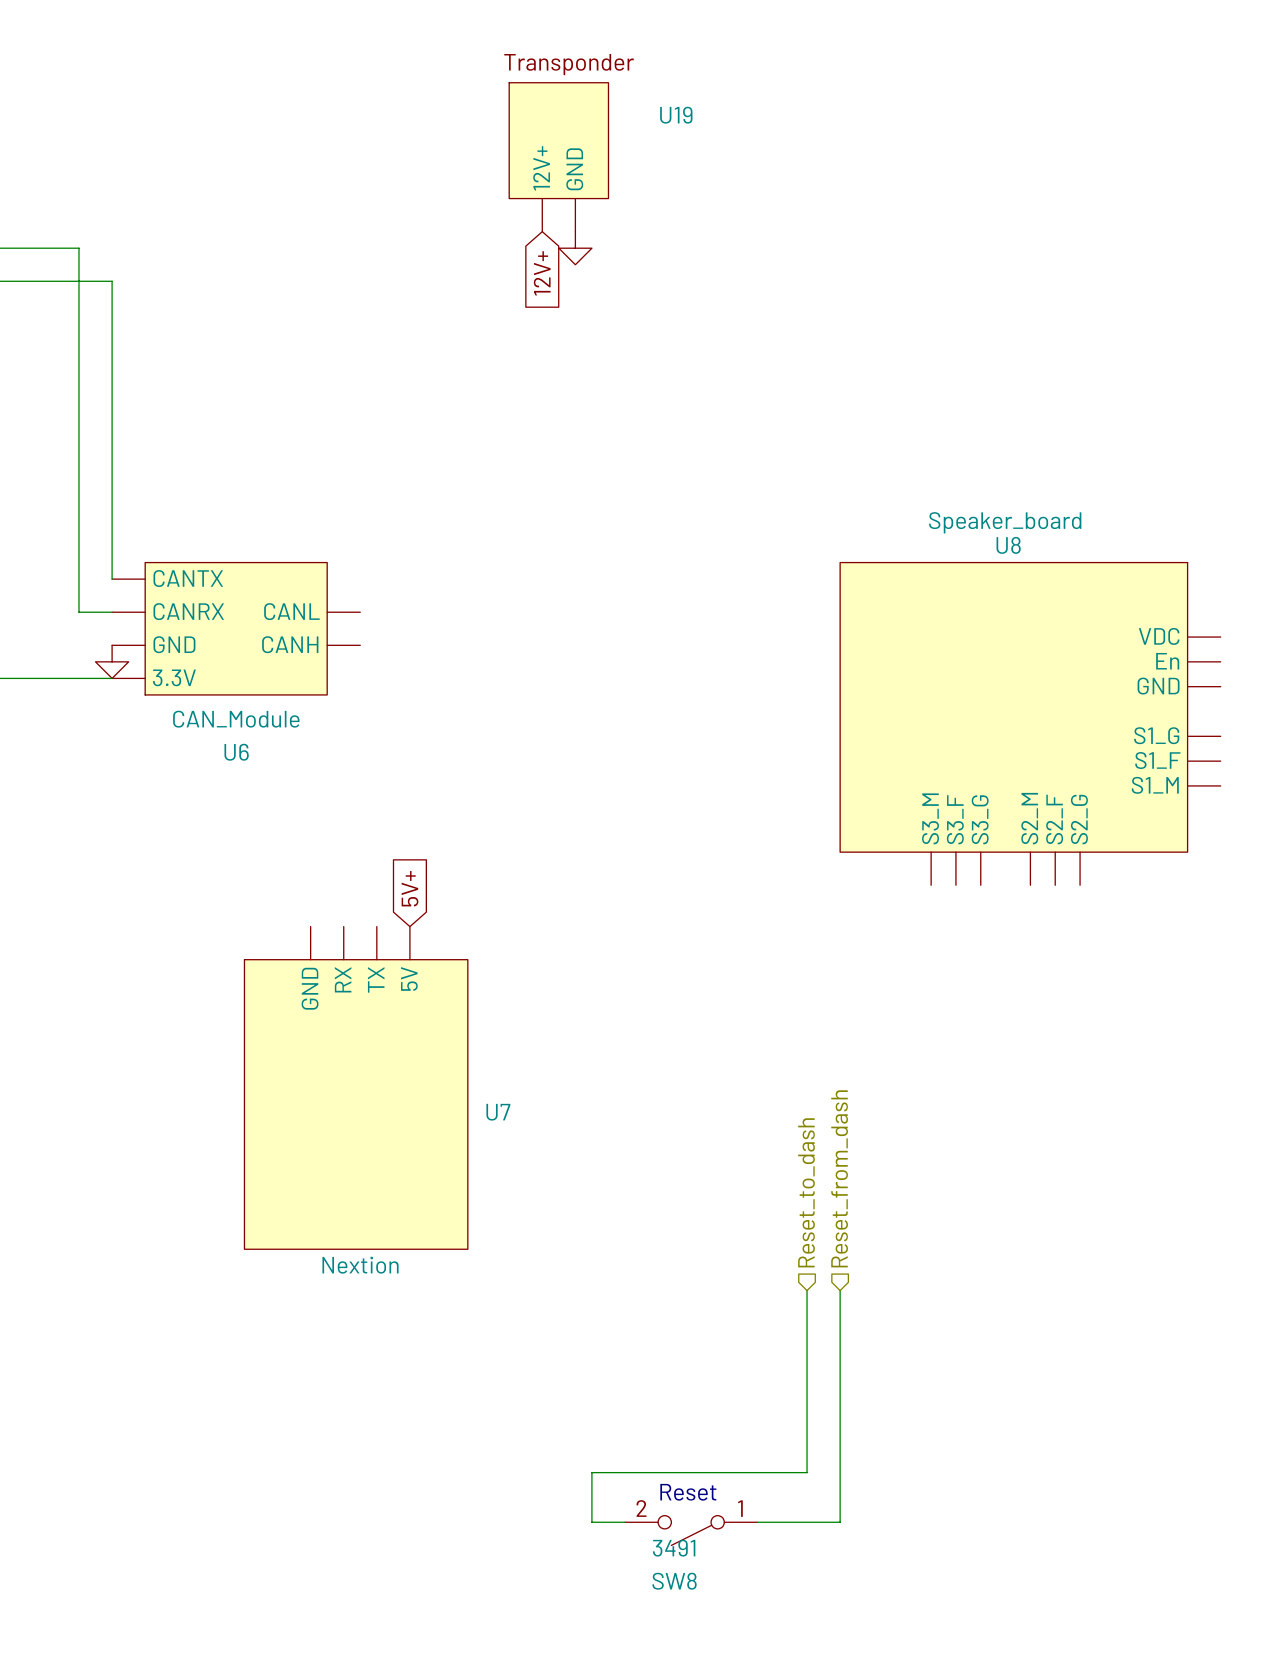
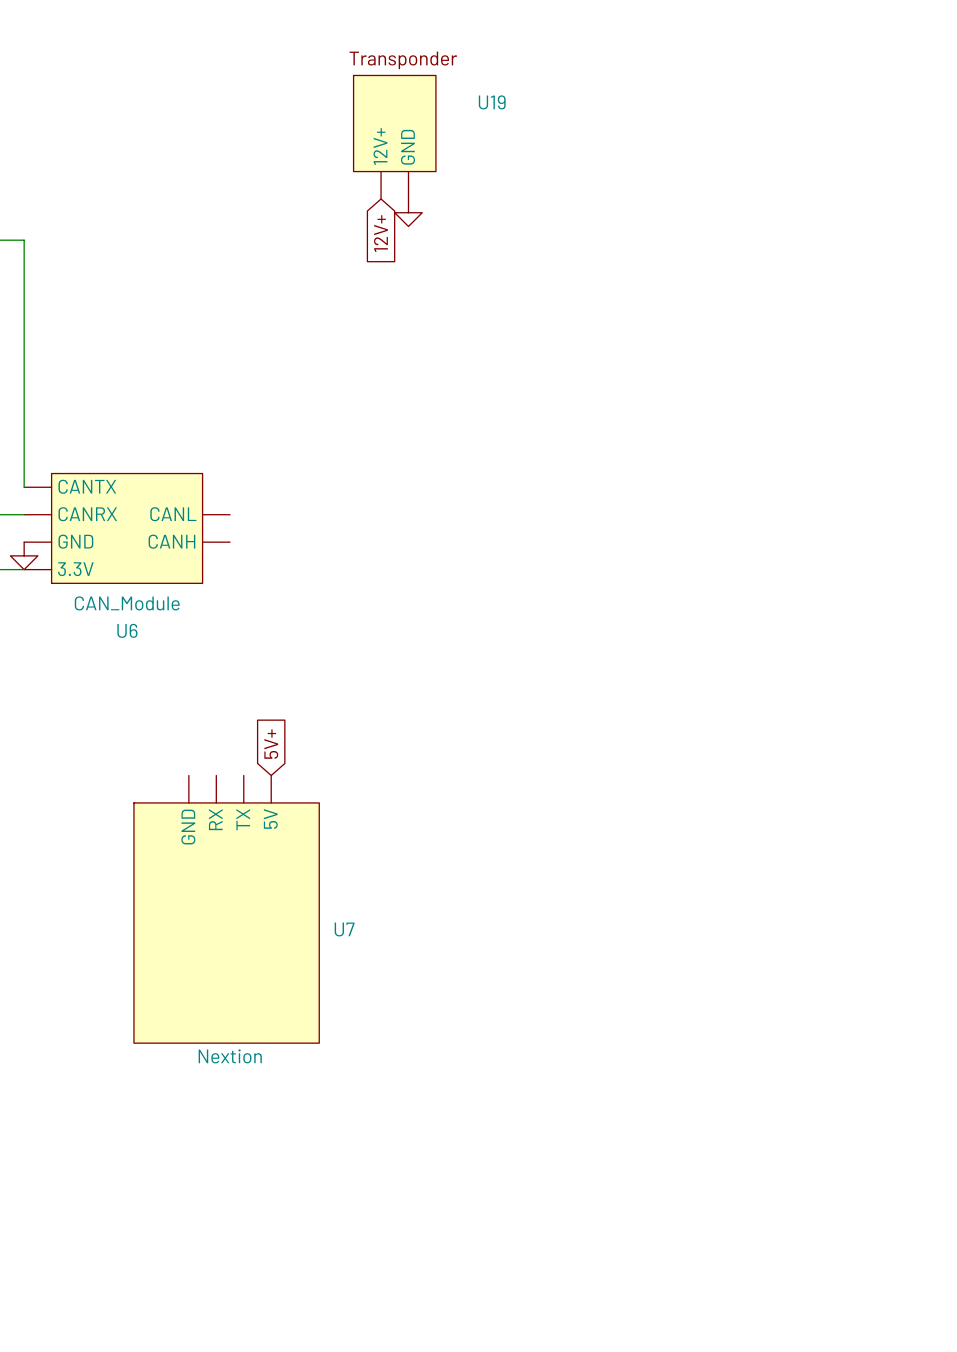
U8: Speaker_board (1030, 723) -> none
hierarchical label: Reset_from_dash (839, 1178) -> none
hierarchical label: Reset_to_dash (806, 1192) -> none
wire: (807, 1290) (807, 1472) (591, 1472) (591, 1522) (625, 1522) -> none
wire: (840, 1290) (840, 1522) (757, 1522) -> none
text: Reset (688, 1492) -> none
SW8: 3491 (691, 1530) -> none

